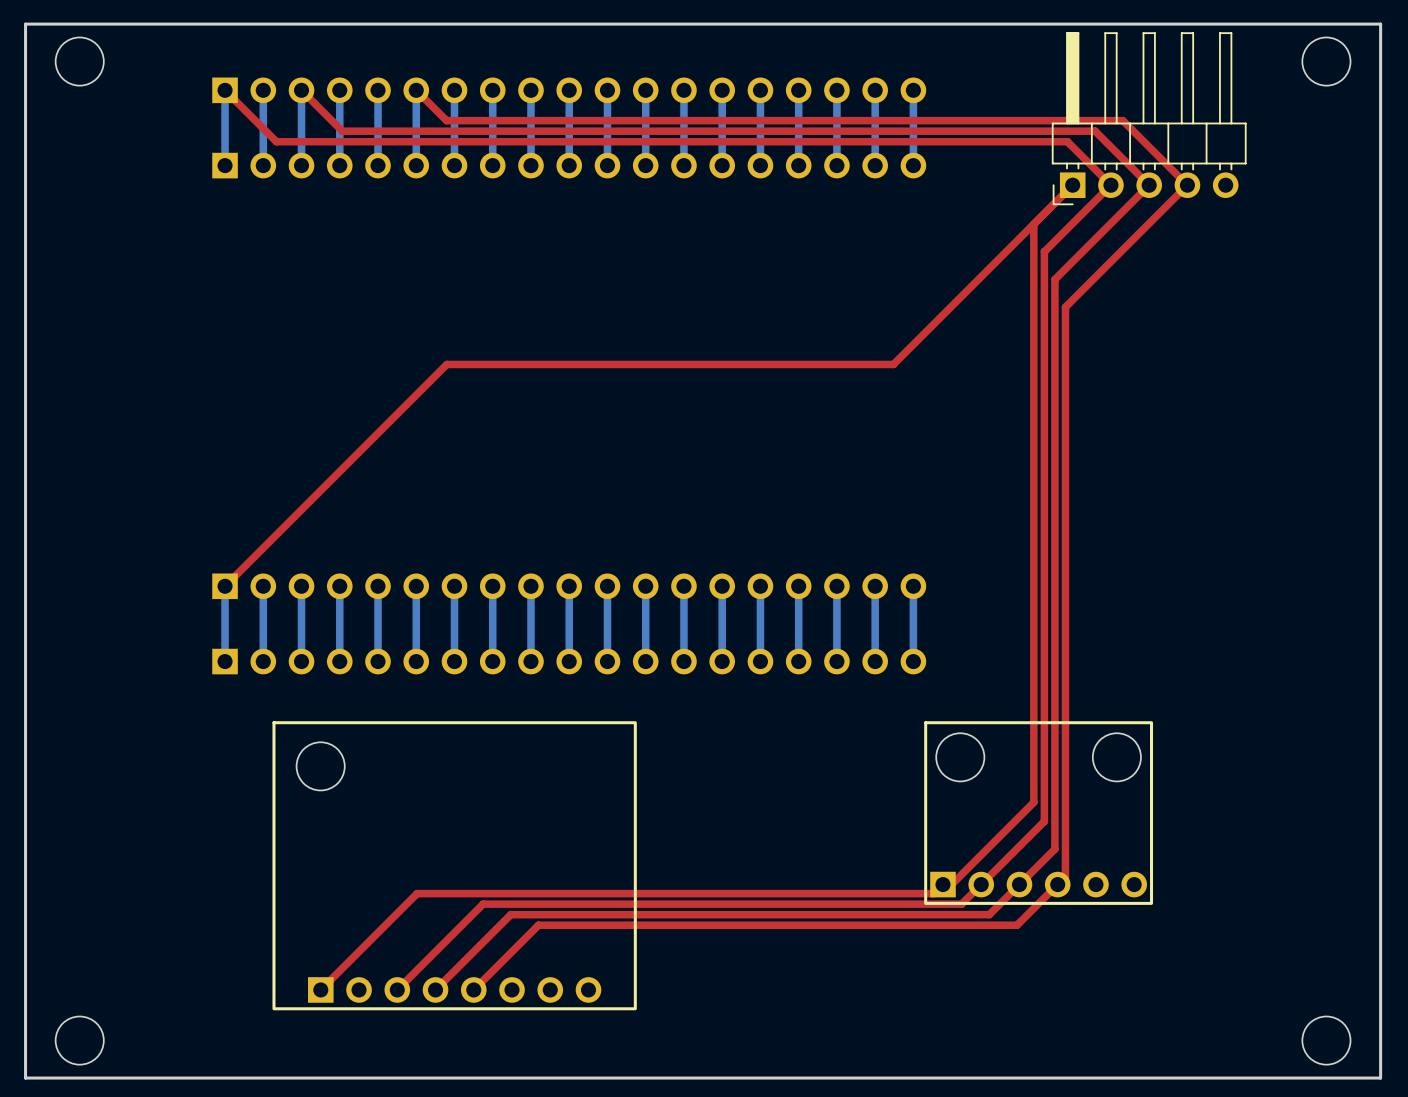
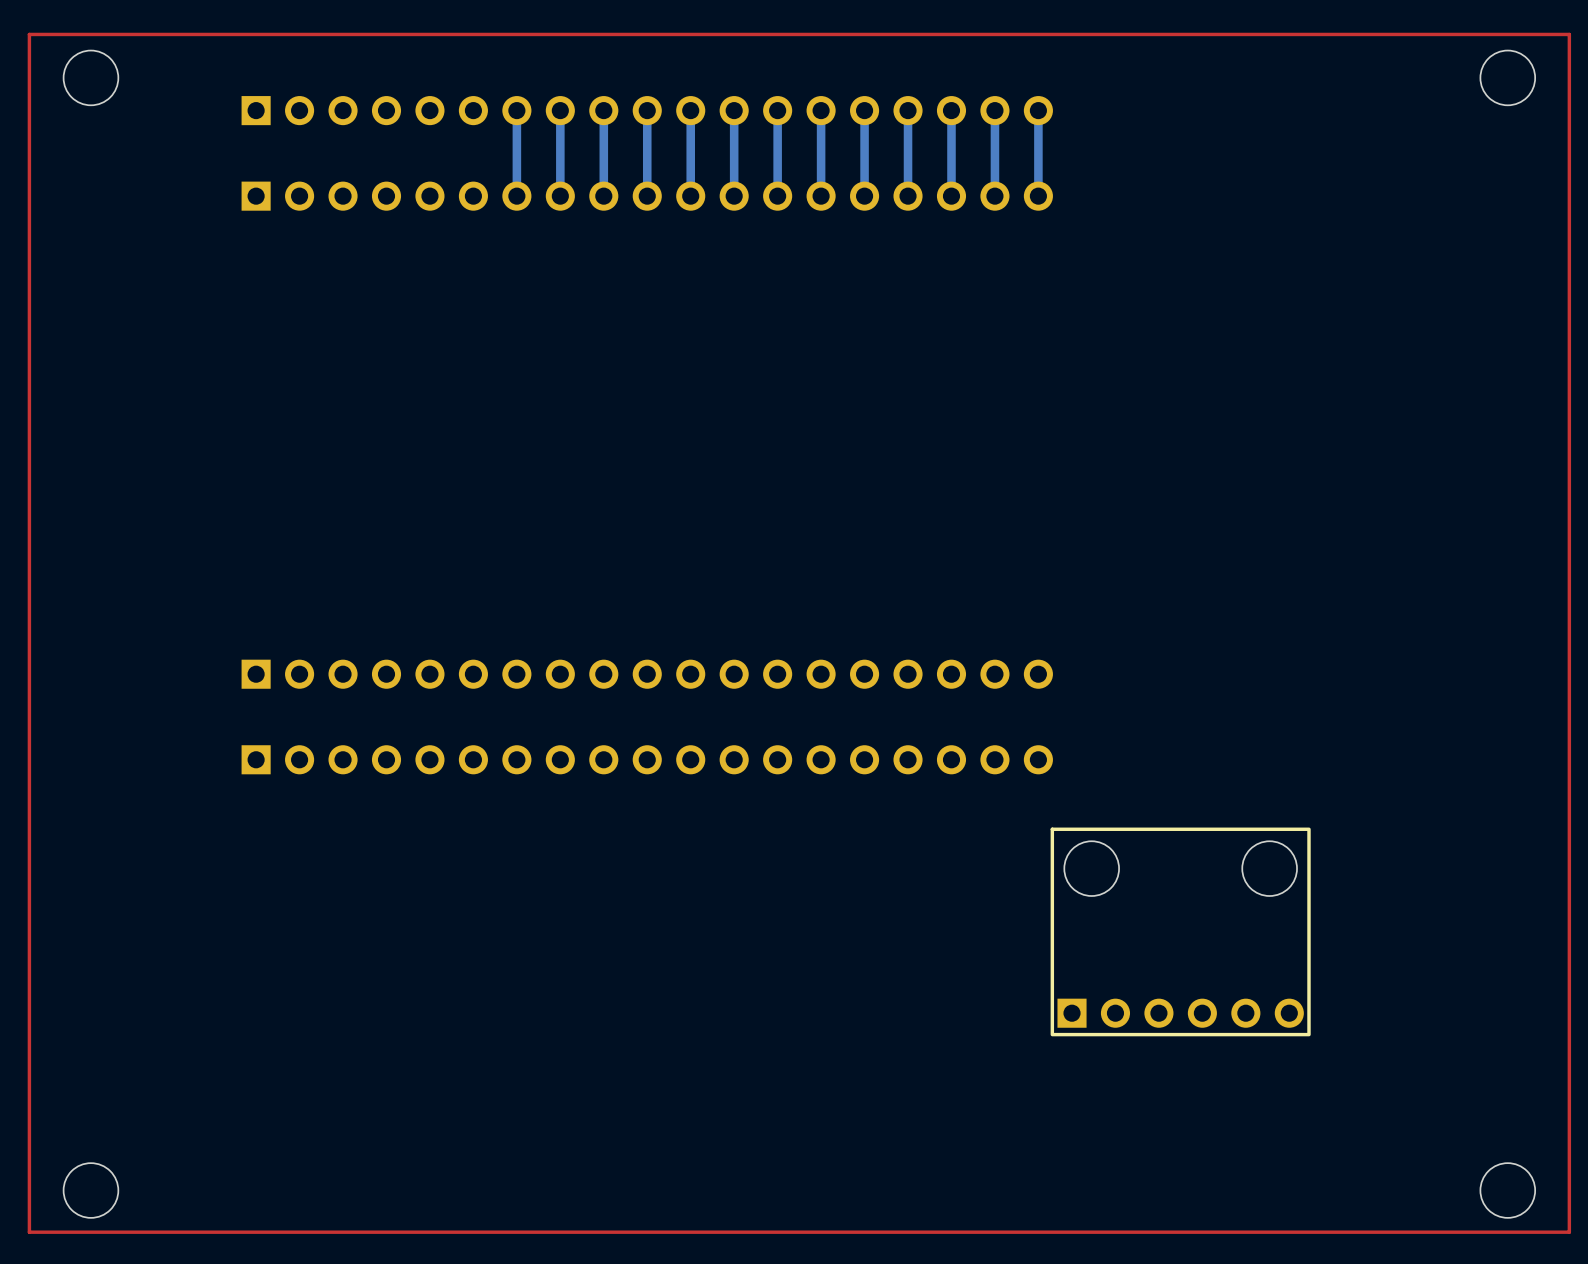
top track: none -> (29, 34) (1569, 34) (1569, 1232) (29, 1232) (29, 34)
board edge: (25, 24) (1380, 24) (1380, 1078) (25, 1078) (25, 24) -> none
bottom track: (225, 90) (225, 165) -> none
top track: (225, 90) (276, 141) (1067, 141) (1110, 185) (1044, 251) (1044, 821) (961, 904) (483, 904) (397, 989) -> none
bottom track: (263, 90) (263, 165) -> none
bottom track: (301, 90) (301, 165) -> none
top track: (301, 90) (342, 131) (1095, 131) (1149, 185) (1054, 279) (1054, 849) (989, 914) (510, 914) (435, 989) -> none
bottom track: (339, 90) (339, 165) -> none
bottom track: (378, 90) (378, 165) -> none
bottom track: (416, 90) (416, 165) -> none
top track: (416, 90) (446, 120) (1122, 120) (1187, 185) (1065, 307) (1065, 876) (1017, 925) (538, 925) (473, 989) -> none
part: (1149, 118) -> none
top track: (1072, 185) (893, 364) (446, 364) (225, 586) -> none
top track: (1033, 224) (1033, 802) (951, 884) (942, 884) (933, 893) (417, 893) (320, 989) -> none
bottom track: (225, 586) (225, 661) -> none
bottom track: (263, 586) (263, 661) -> none
bottom track: (301, 586) (301, 661) -> none
bottom track: (339, 586) (339, 661) -> none
bottom track: (378, 586) (378, 661) -> none
bottom track: (416, 586) (416, 661) -> none
bottom track: (454, 586) (454, 661) -> none
bottom track: (492, 586) (492, 661) -> none
bottom track: (530, 586) (530, 661) -> none
bottom track: (569, 586) (569, 661) -> none
bottom track: (607, 586) (607, 661) -> none
bottom track: (645, 586) (645, 661) -> none
bottom track: (683, 586) (683, 661) -> none
bottom track: (722, 586) (722, 661) -> none
bottom track: (760, 586) (760, 661) -> none
bottom track: (798, 586) (798, 661) -> none
bottom track: (836, 586) (836, 661) -> none
bottom track: (875, 586) (875, 661) -> none
bottom track: (913, 586) (913, 661) -> none
part: (454, 865) -> none

